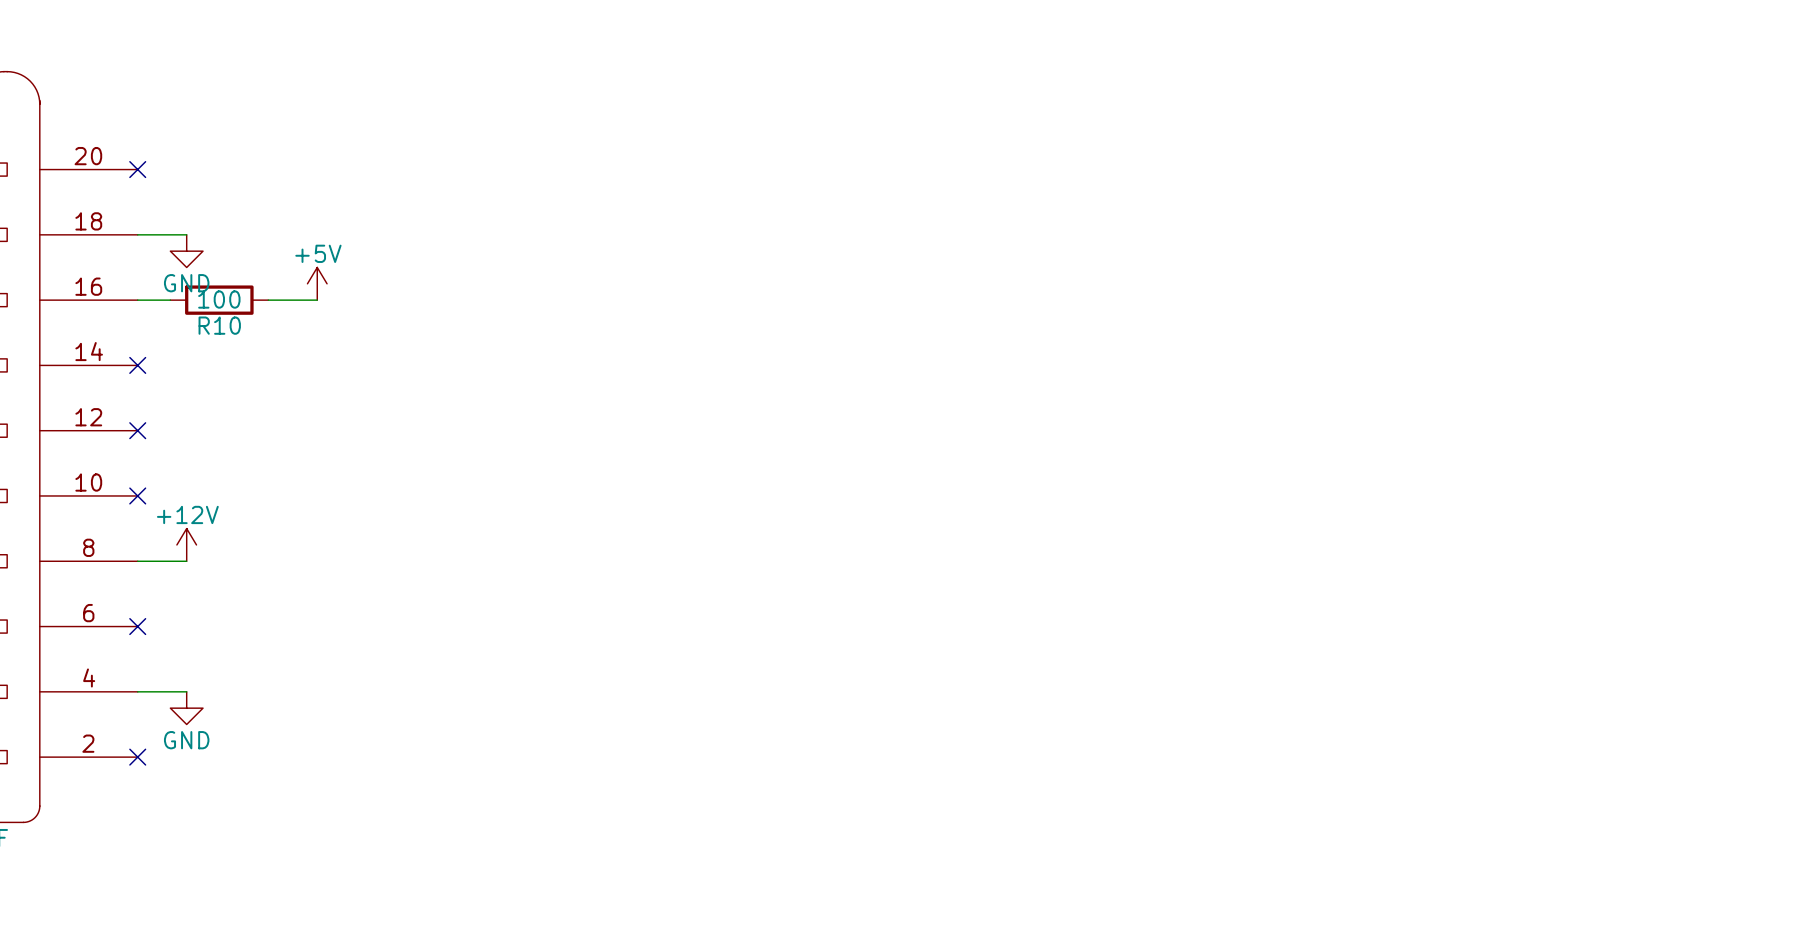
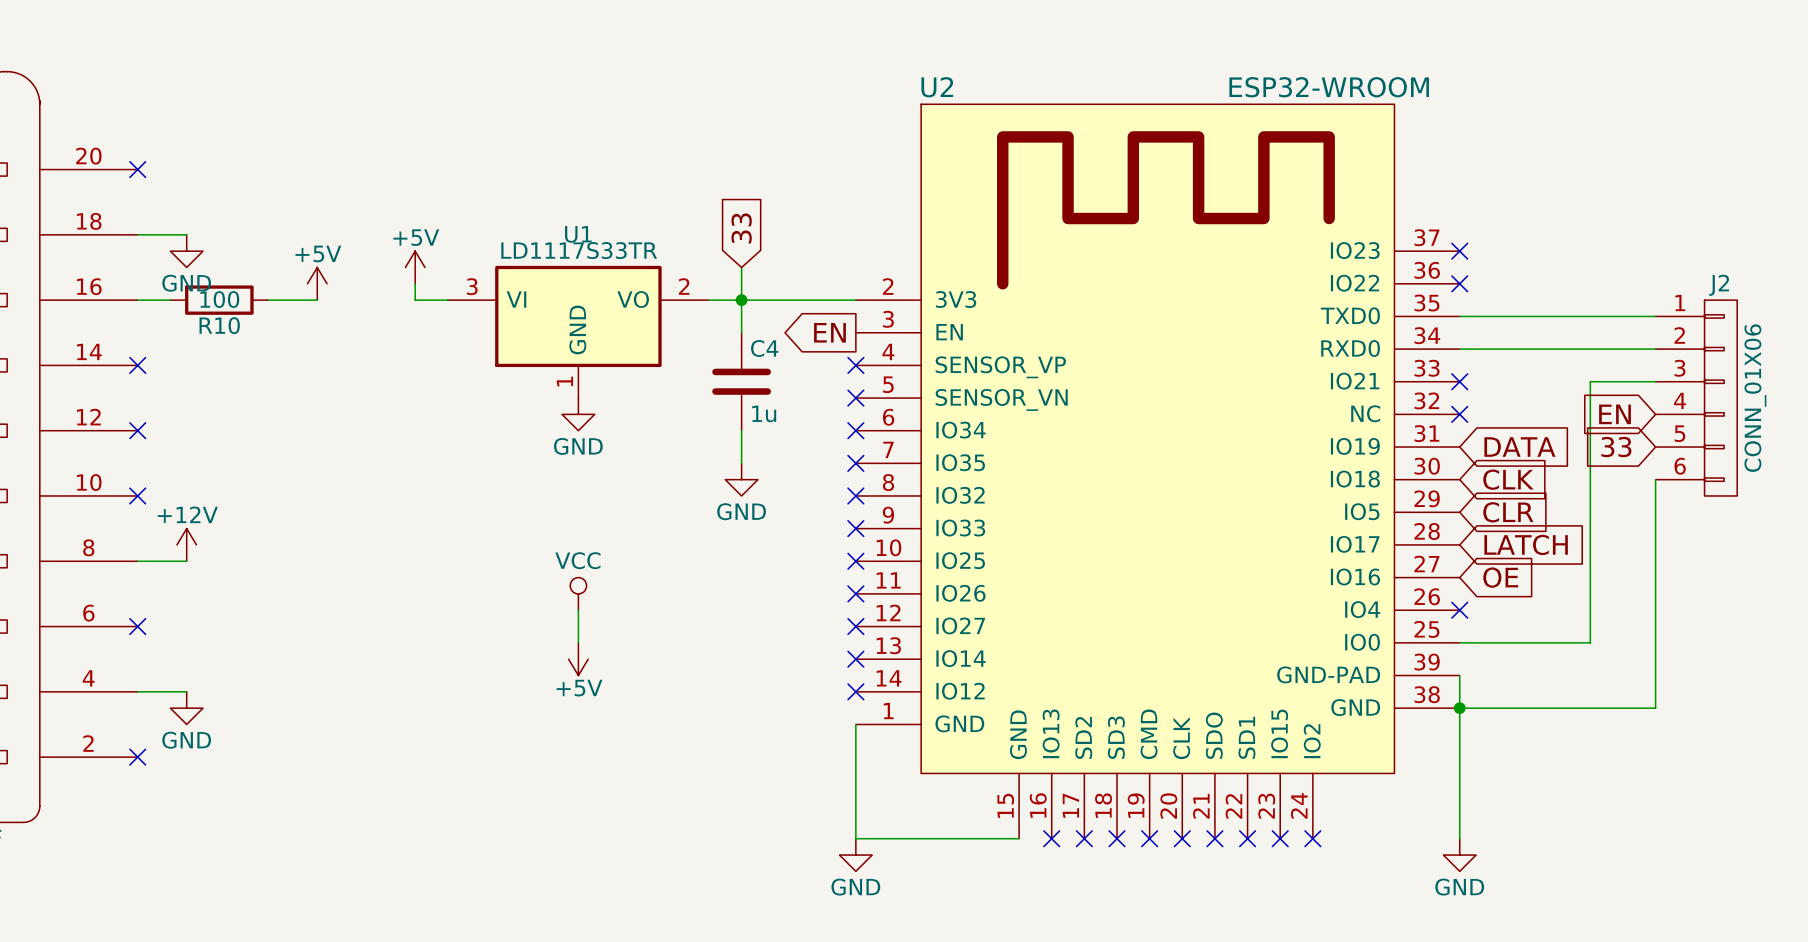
global label: none -> 33 (741, 228)
no-connect mark: none -> (1459, 251)
power symbol: none -> +5V (415, 267)
wire: none -> (741, 267) (741, 332)
wire: none -> (415, 283) (415, 300) (447, 300)
no-connect mark: none -> (1459, 283)
wire: none -> (708, 300) (855, 300)
junction: none -> (741, 300)
wire: none -> (1459, 316) (1655, 316)
U1: none -> LD1117S33TR (578, 331)
global label: none -> EN (829, 332)
wire: none -> (1459, 349) (1655, 349)
no-connect mark: none -> (855, 365)
C4: none -> 1u (741, 381)
no-connect mark: none -> (1459, 381)
wire: none -> (1655, 381) (1590, 381) (1590, 642) (1459, 642)
no-connect mark: none -> (855, 398)
J2: none -> CONN_01X06 (1696, 398)
power symbol: none -> GND (578, 414)
no-connect mark: none -> (1459, 414)
global label: none -> EN (1615, 414)
wire: none -> (741, 430) (741, 463)
no-connect mark: none -> (855, 430)
global label: none -> DATA (1519, 447)
global label: none -> 33 (1616, 447)
no-connect mark: none -> (855, 463)
U2: none -> ESP32-WROOM (1157, 471)
power symbol: none -> GND (741, 479)
global label: none -> CLK (1508, 479)
wire: none -> (1655, 479) (1655, 708) (1459, 708)
no-connect mark: none -> (855, 495)
global label: none -> CLR (1508, 512)
no-connect mark: none -> (855, 528)
global label: none -> LATCH (1526, 544)
no-connect mark: none -> (855, 561)
global label: none -> OE (1500, 577)
power symbol: none -> VCC (578, 593)
no-connect mark: none -> (855, 593)
wire: none -> (578, 610) (578, 642)
no-connect mark: none -> (1459, 610)
no-connect mark: none -> (855, 626)
power symbol: none -> +5V (578, 659)
no-connect mark: none -> (855, 659)
wire: none -> (1459, 675) (1459, 838)
no-connect mark: none -> (855, 691)
junction: none -> (1459, 708)
wire: none -> (855, 724) (855, 838) (1019, 838)
no-connect mark: none -> (1051, 838)
no-connect mark: none -> (1084, 838)
no-connect mark: none -> (1116, 838)
no-connect mark: none -> (1149, 838)
no-connect mark: none -> (1182, 838)
no-connect mark: none -> (1214, 838)
no-connect mark: none -> (1247, 838)
no-connect mark: none -> (1280, 838)
no-connect mark: none -> (1312, 838)
power symbol: none -> GND (855, 855)
power symbol: none -> GND (1459, 855)

